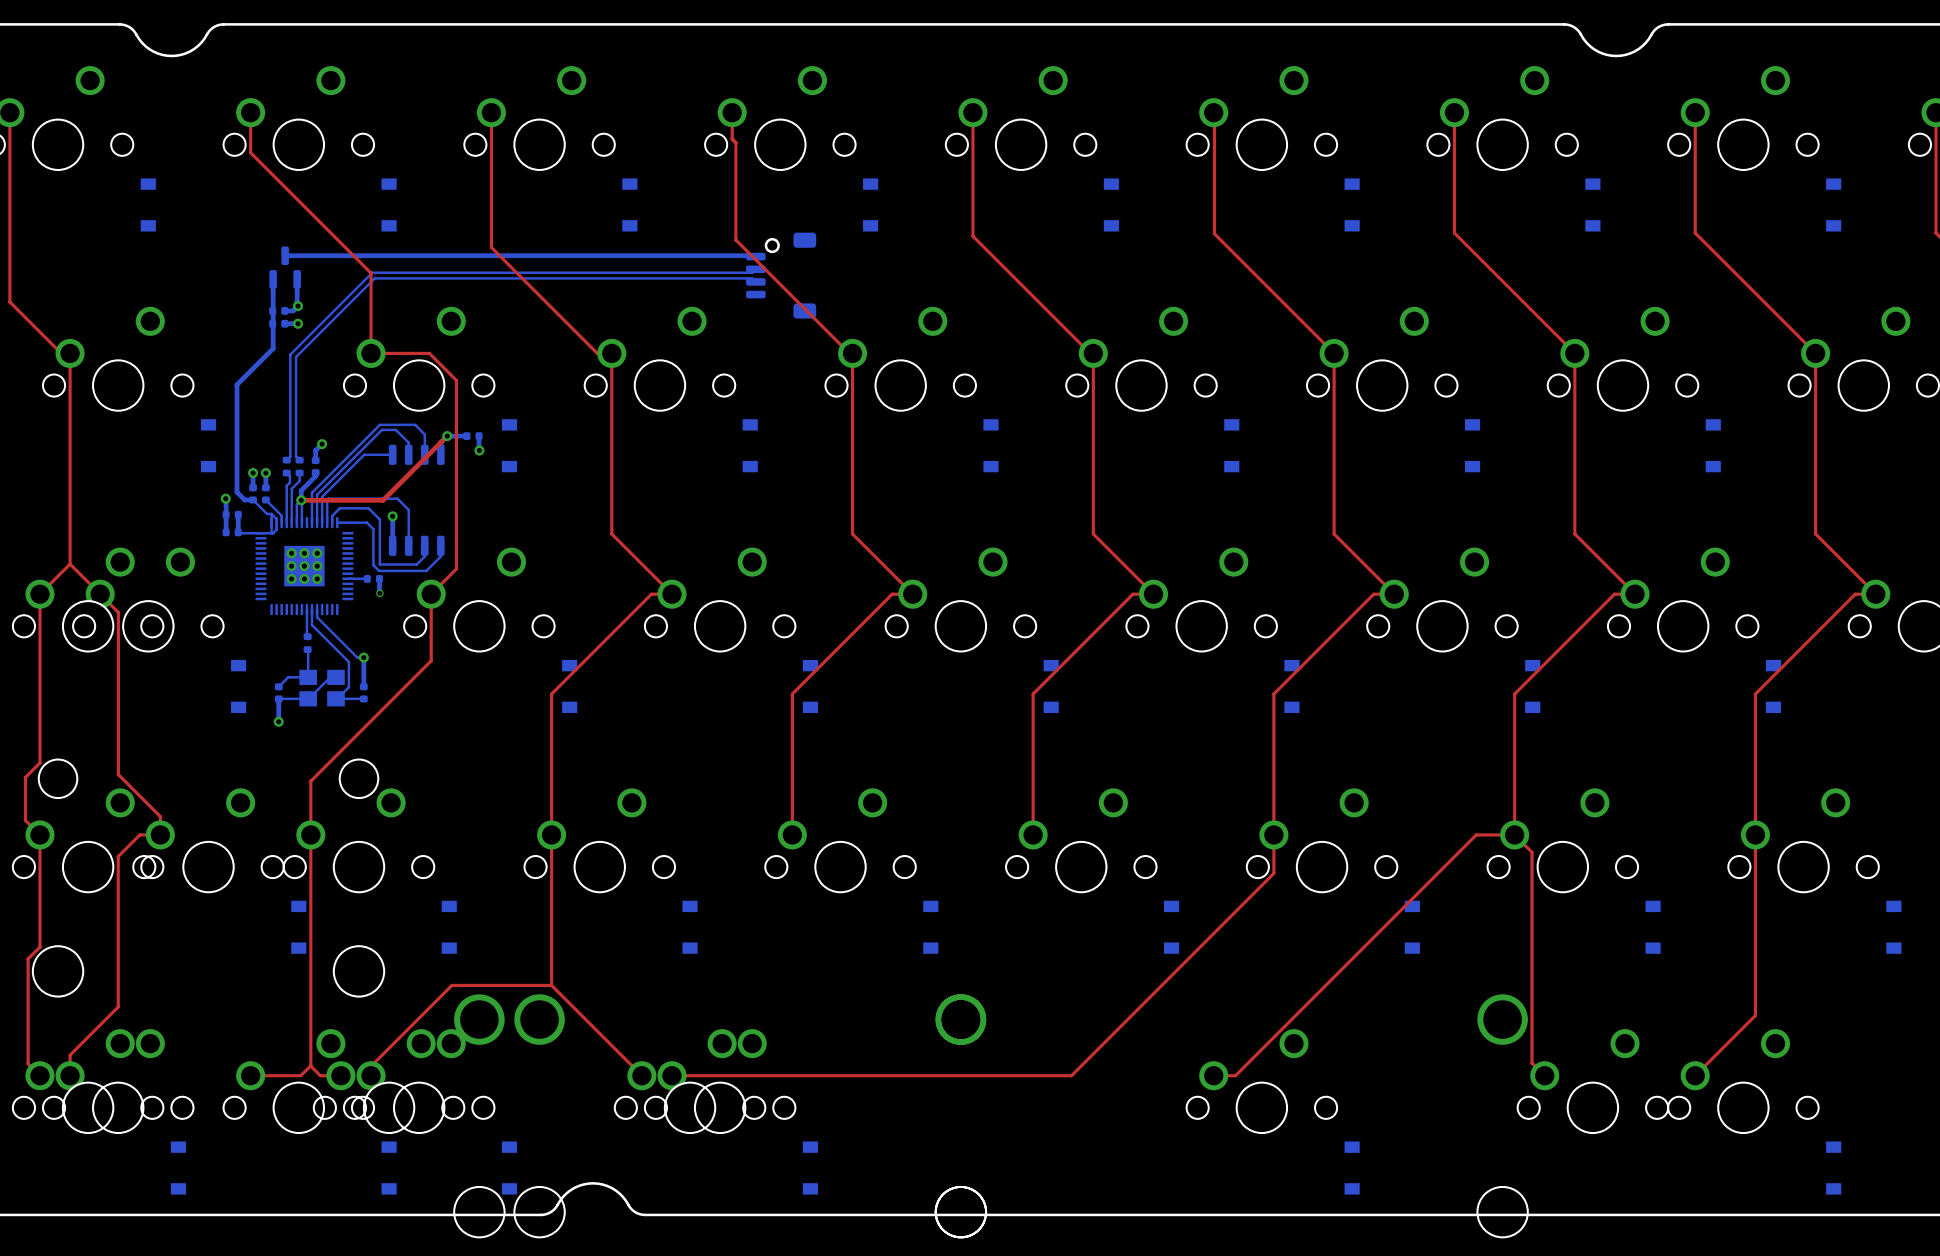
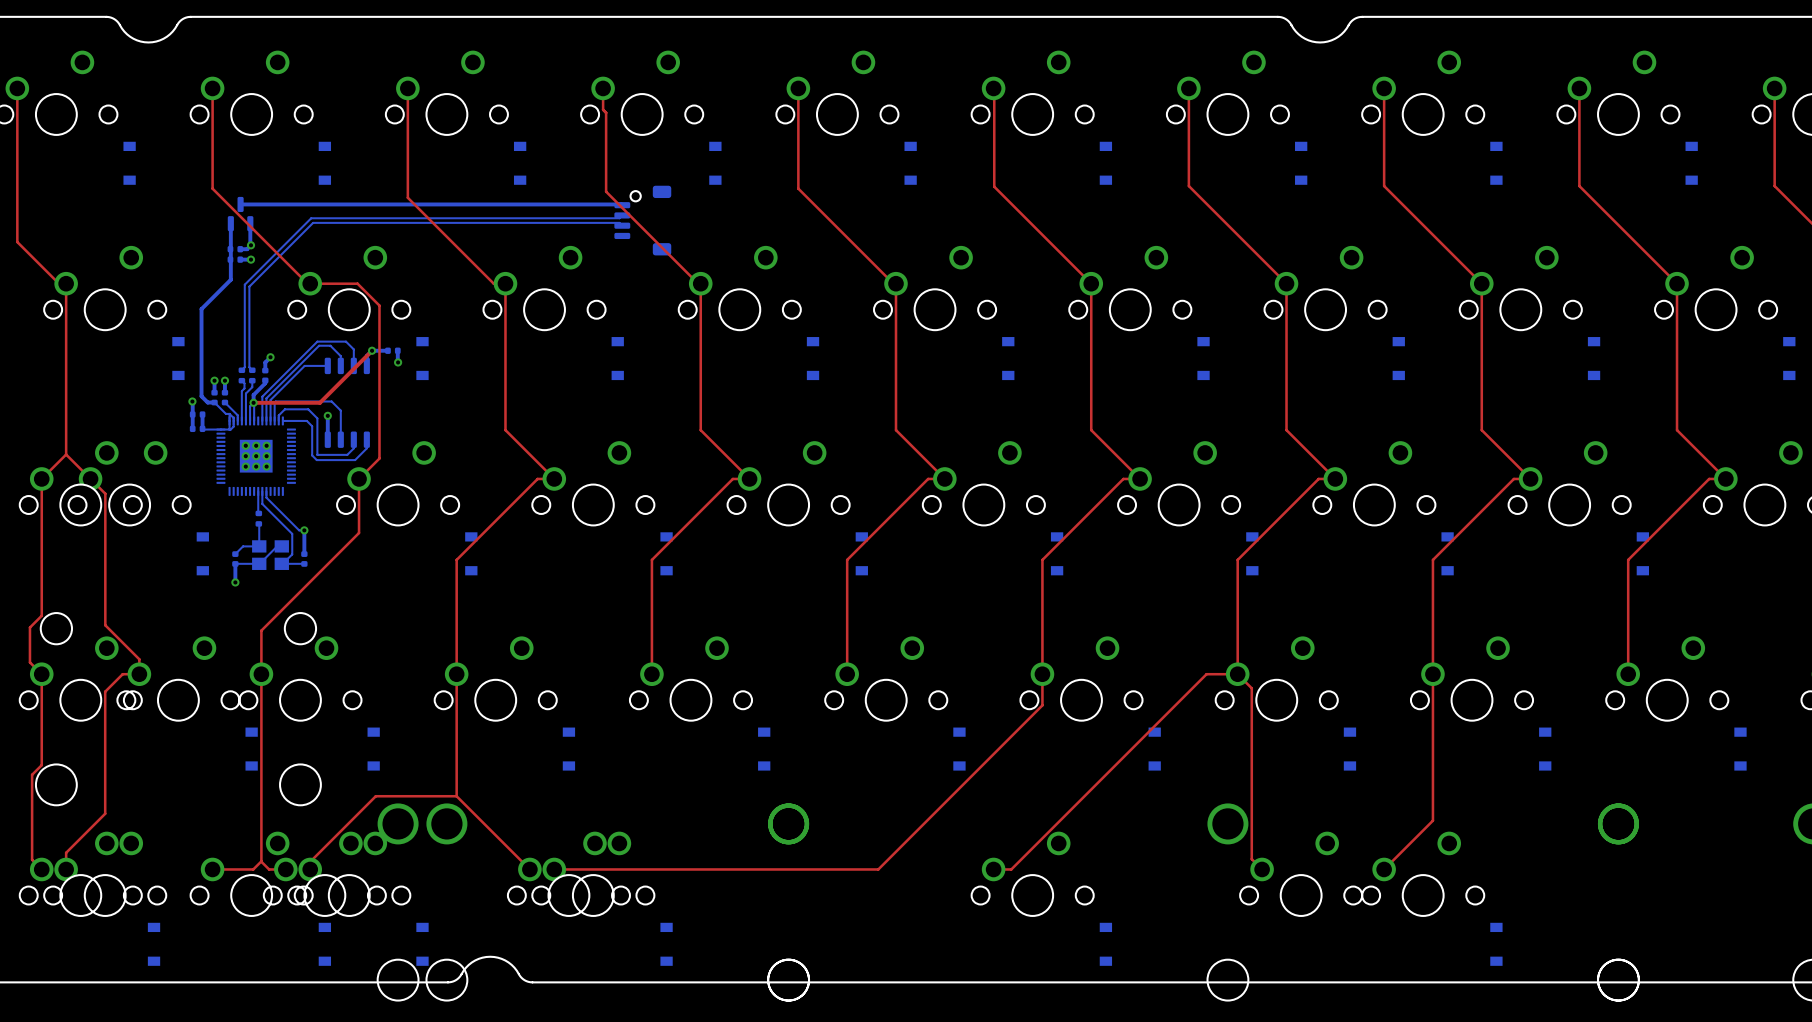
top track: (250, 152) (371, 273) (371, 353) -> (212, 120) (212, 188) (307, 283) (310, 283)
bottom track: (347, 578) (367, 578) -> none
part: (373, 578) -> none
bottom track: (379, 578) (379, 593) -> none
via: (379, 593) -> none

